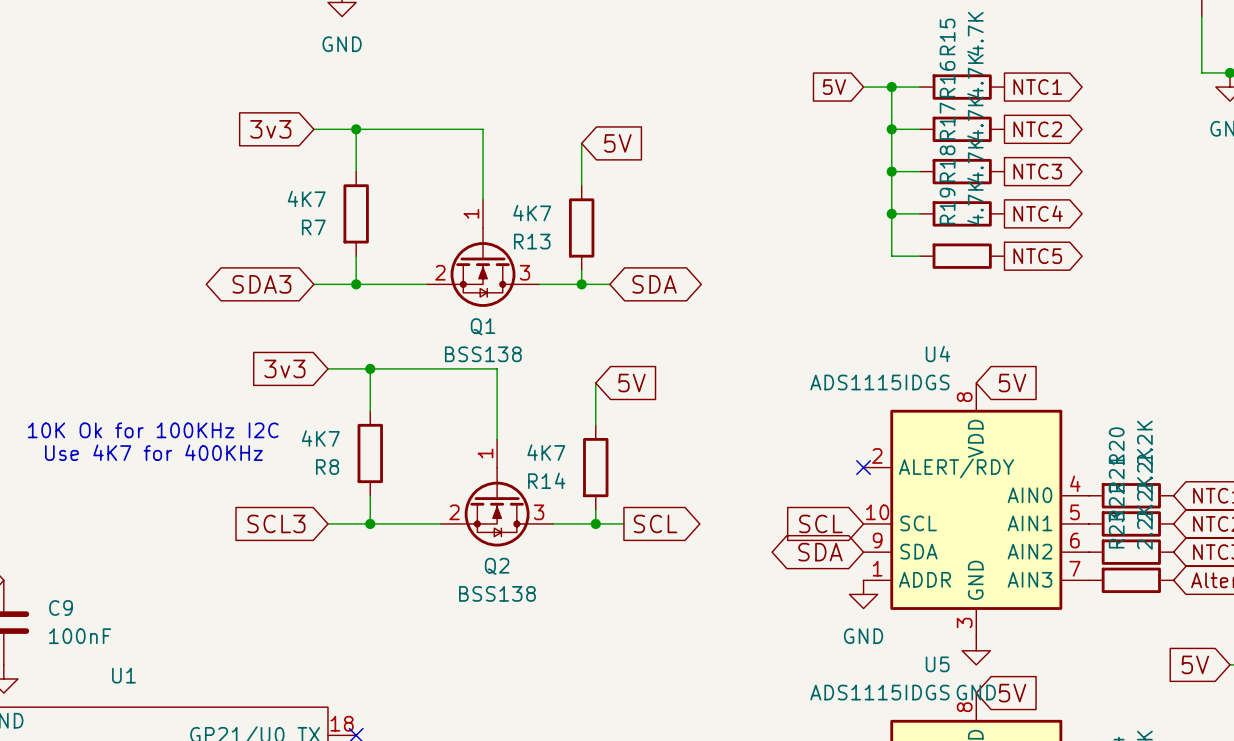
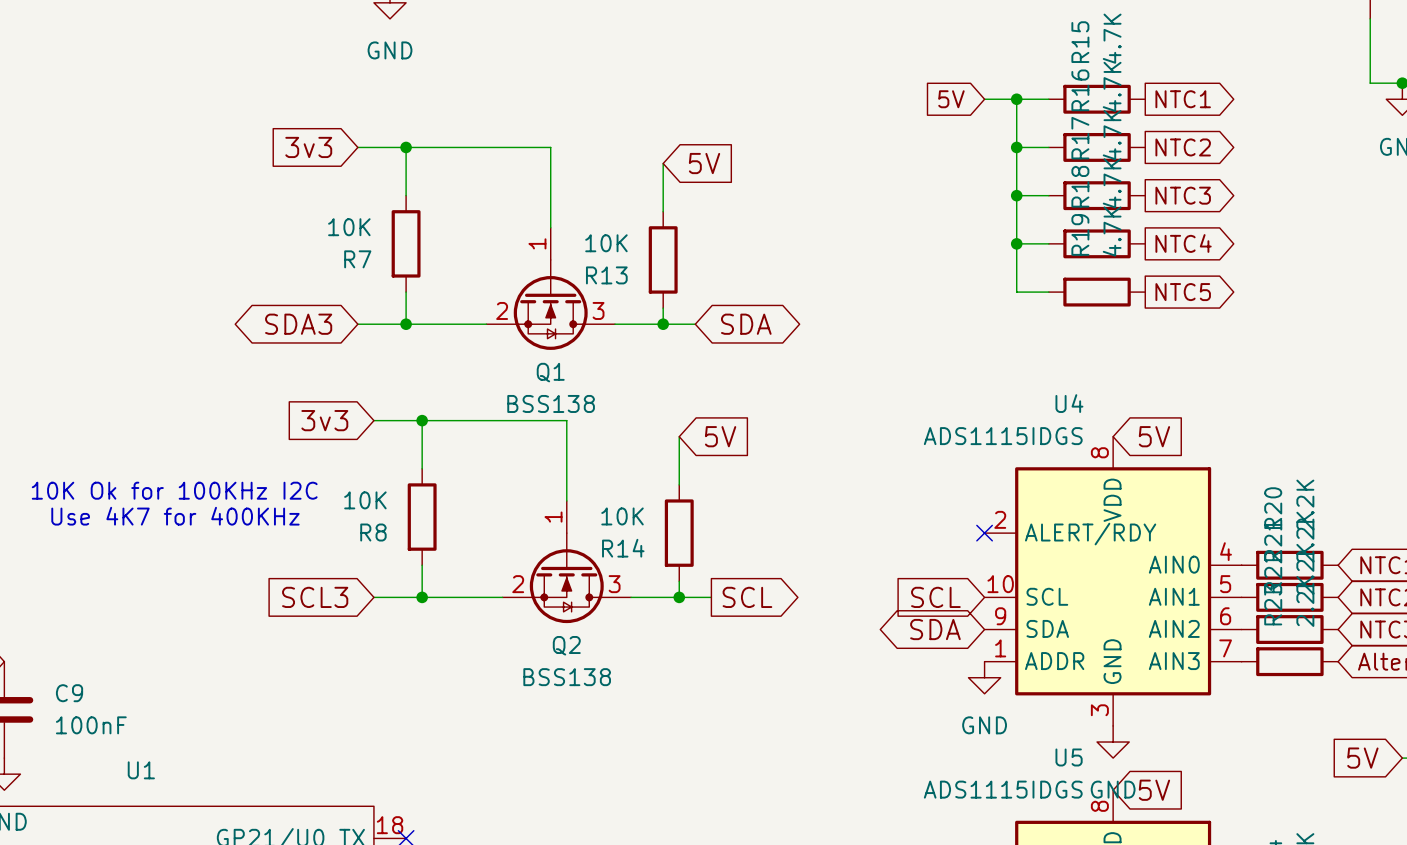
R7 value: 4K7 (306, 198) -> 10K (349, 227)
R13 value: 4K7 (532, 213) -> 10K (606, 243)
R8 value: 4K7 (320, 438) -> 10K (365, 500)
R14 value: 4K7 (546, 452) -> 10K (622, 516)

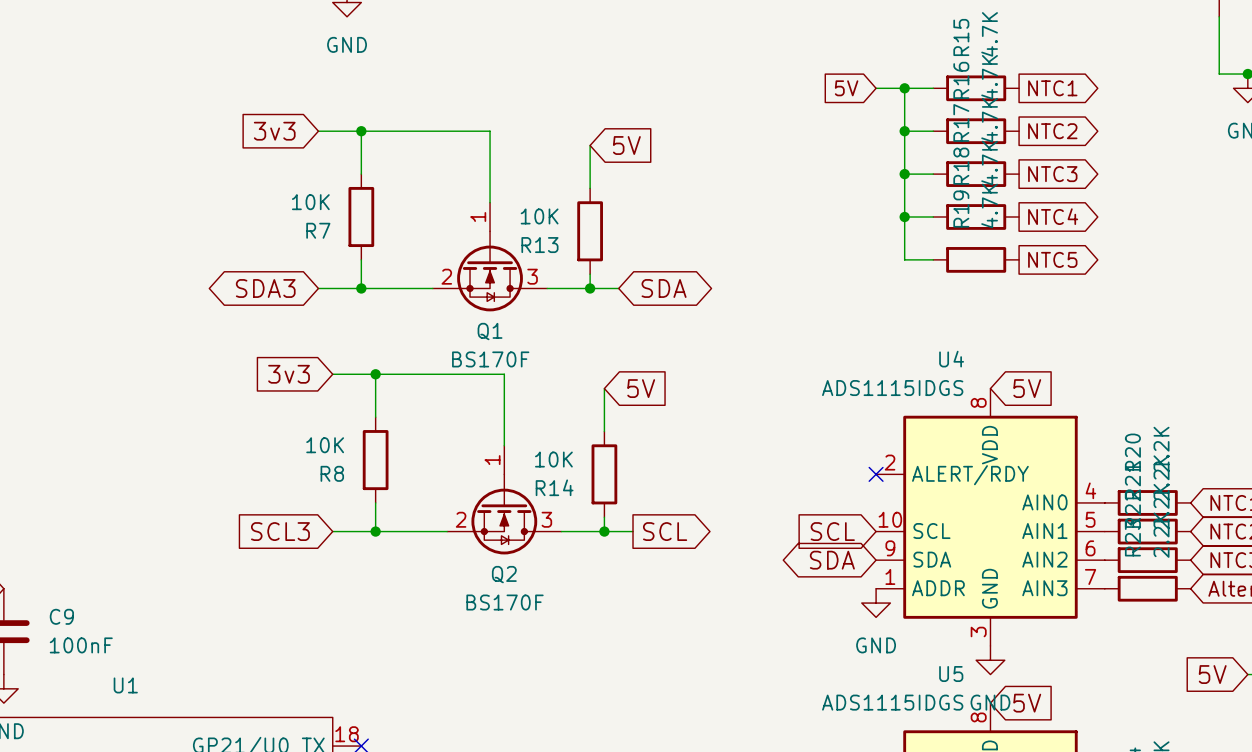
Q1 value: BSS138 (551, 403) -> BS170F (490, 359)
text: 10K Ok for 100KHz I2C (174, 490) -> none
text: Use 4K7 for 400KHz (175, 516) -> none
Q2 value: BSS138 (567, 677) -> BS170F (505, 602)

